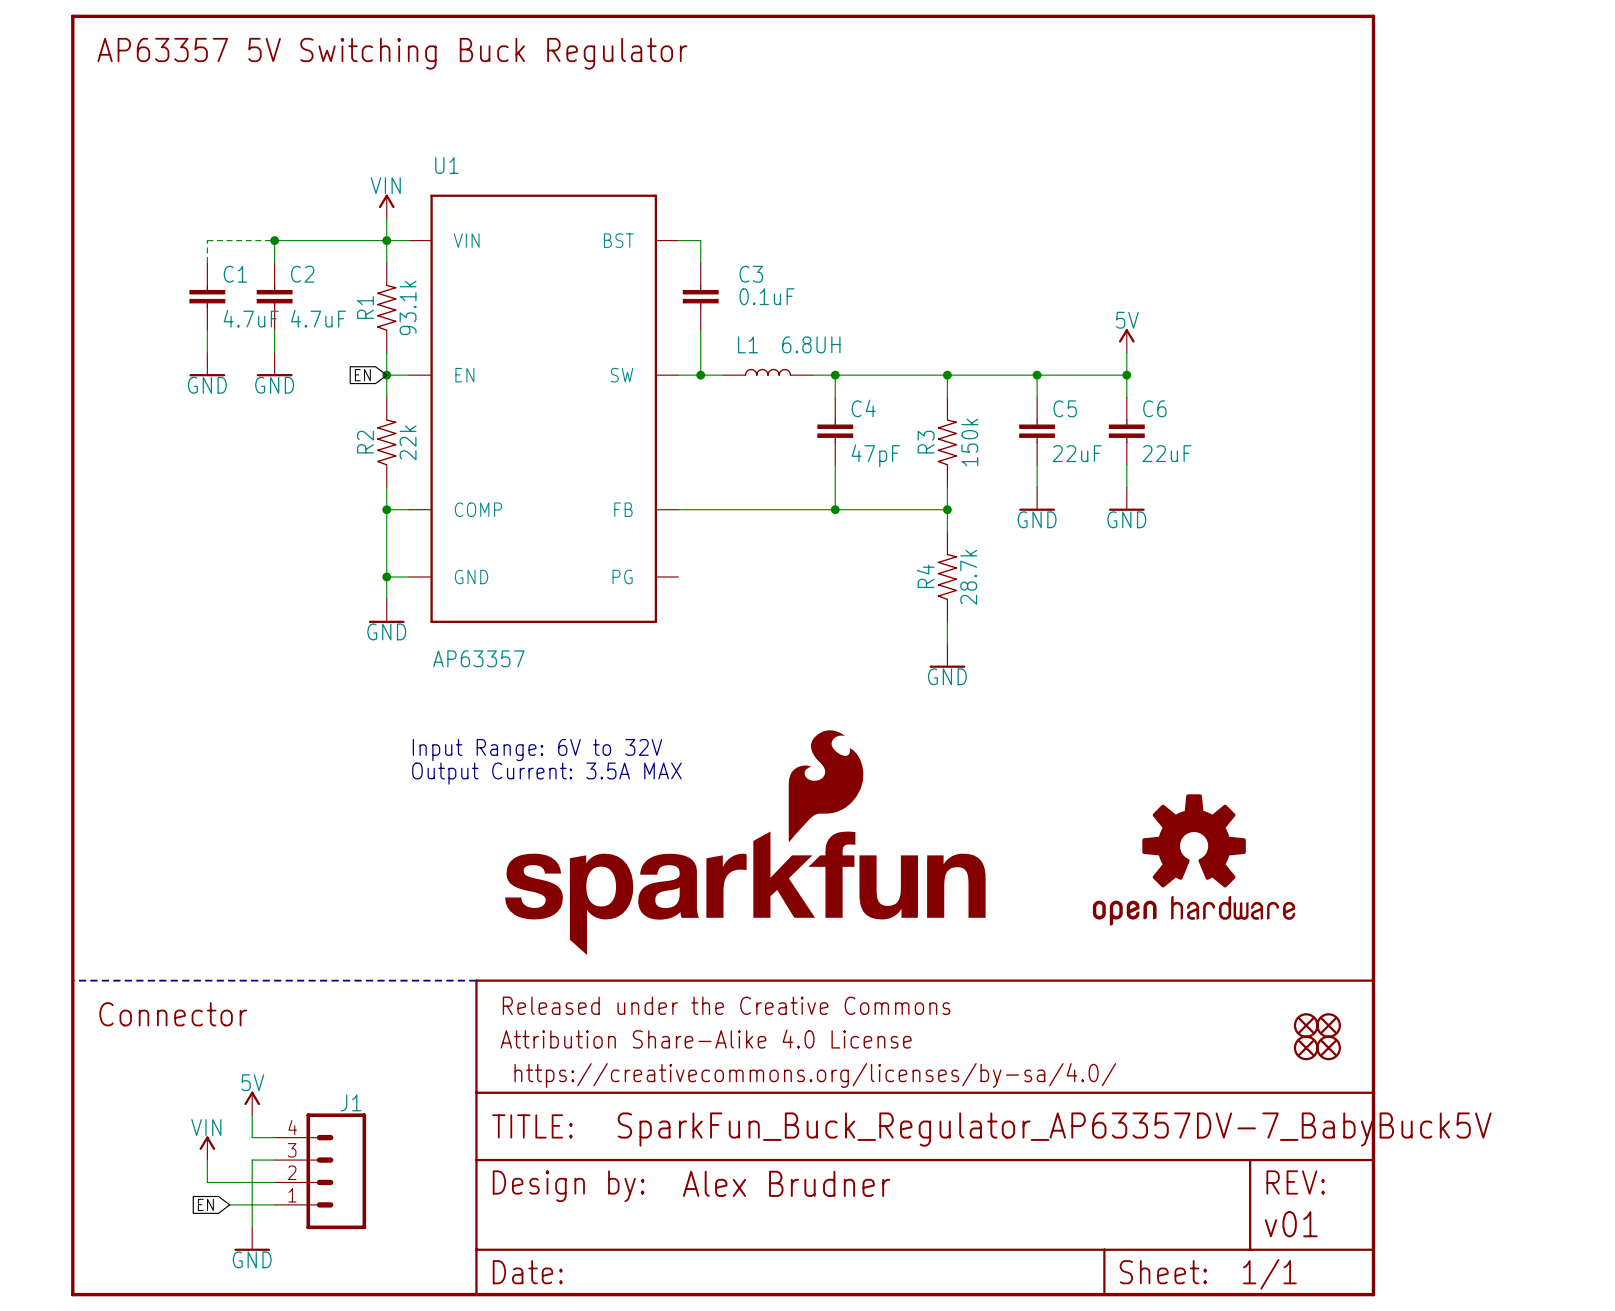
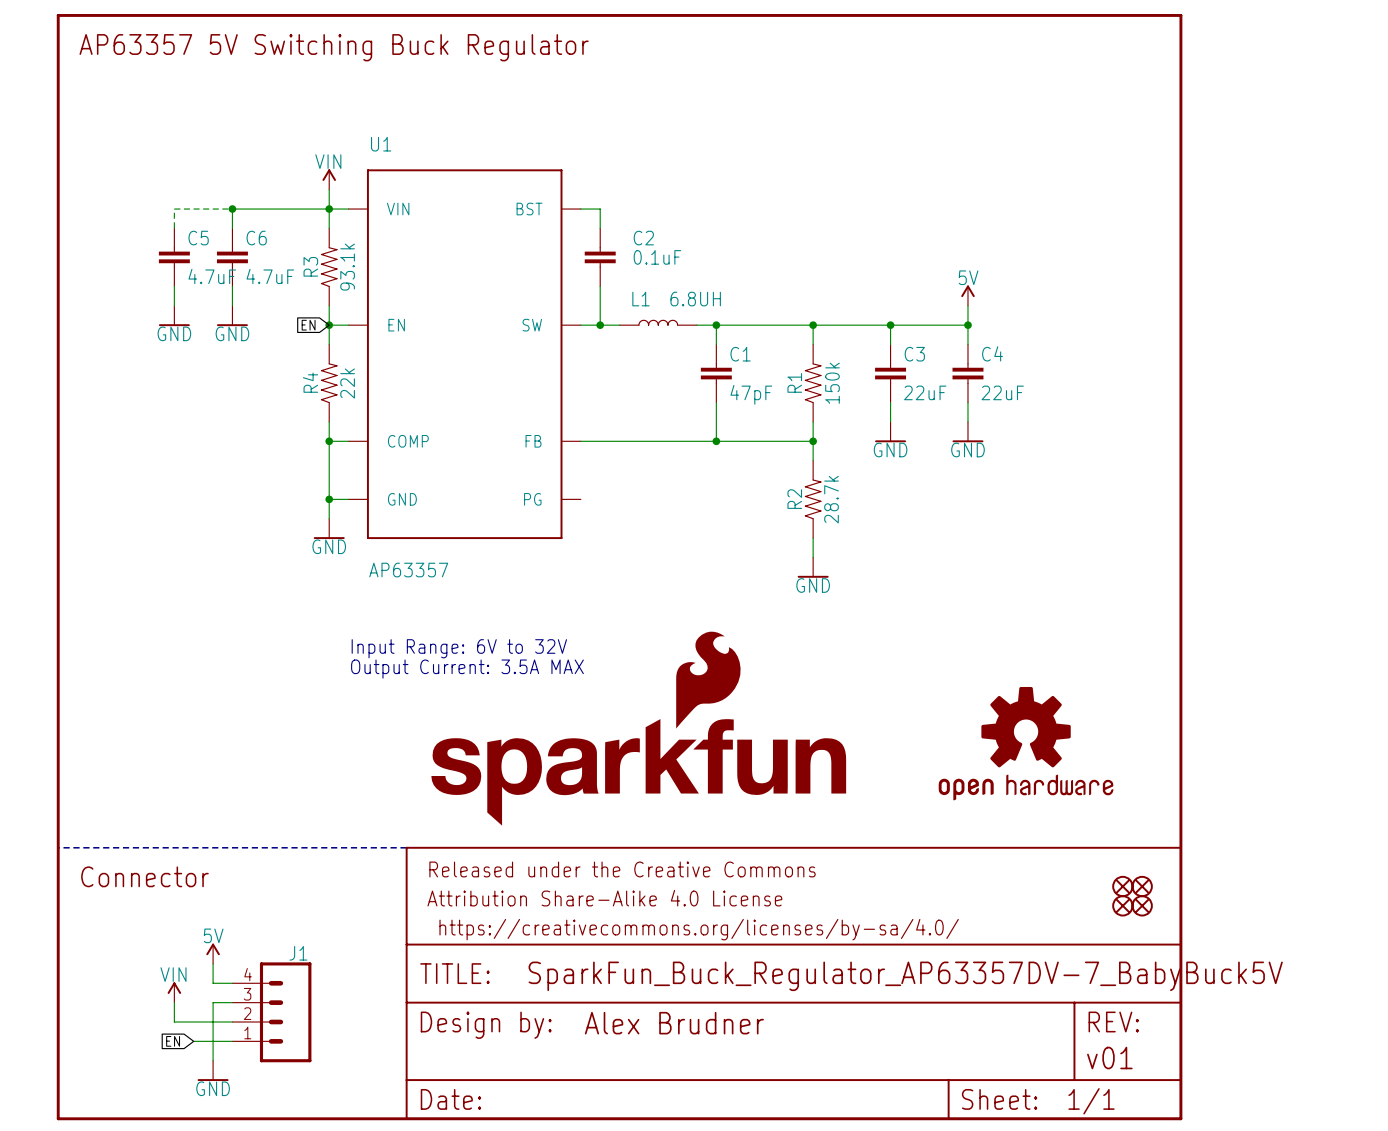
C1 name: C1 (235, 274) -> C5 (198, 238)
C2 name: C2 (302, 274) -> C6 (256, 238)
C3 name: C3 (751, 274) -> C2 (643, 238)
R1 name: R1 (365, 307) -> R3 (310, 266)
C4 name: C4 (863, 408) -> C1 (740, 354)
C5 name: C5 (1065, 408) -> C3 (914, 354)
C6 name: C6 (1154, 408) -> C4 (992, 353)
R2 name: R2 (365, 442) -> R4 (310, 382)
R3 name: R3 (926, 442) -> R1 (794, 382)
R4 name: R4 (925, 576) -> R2 (794, 499)

